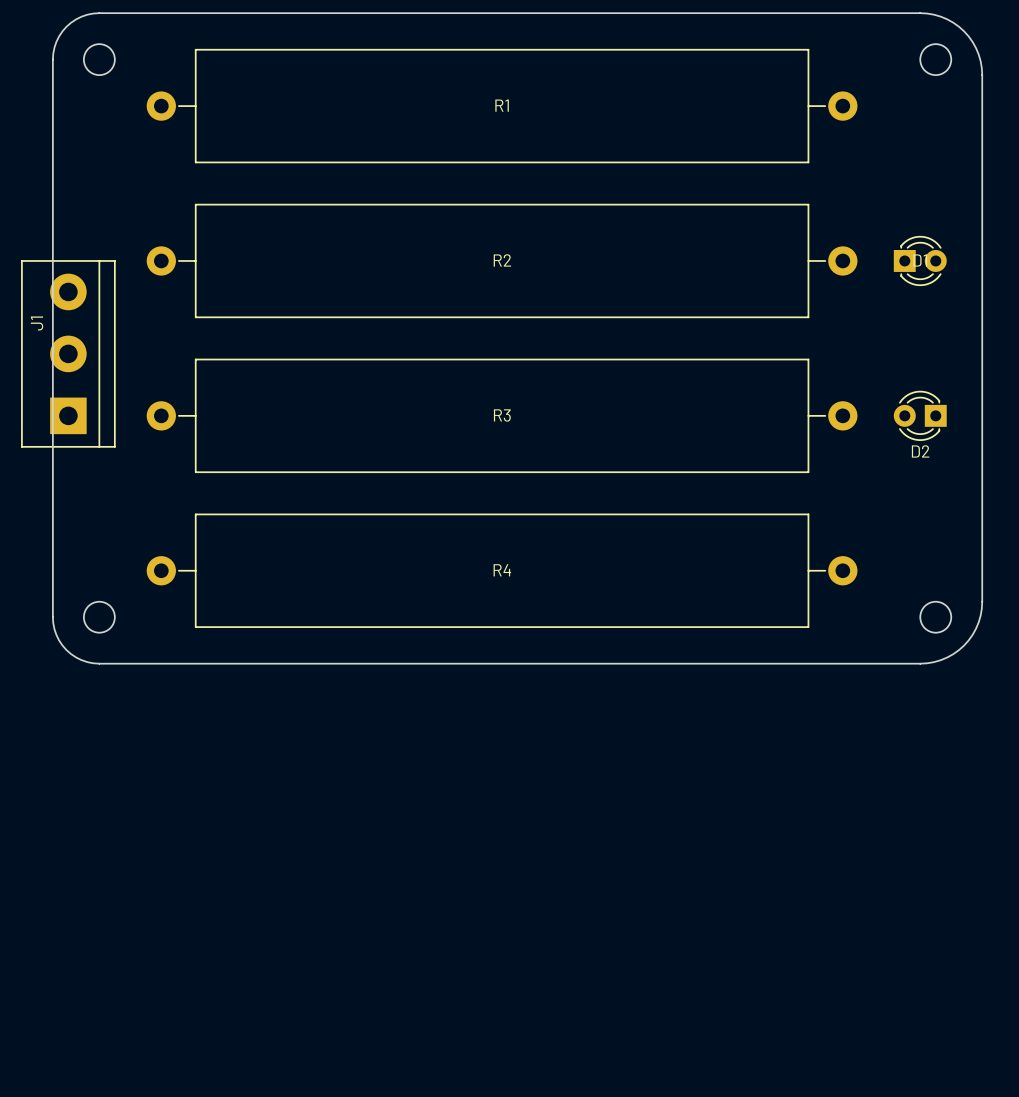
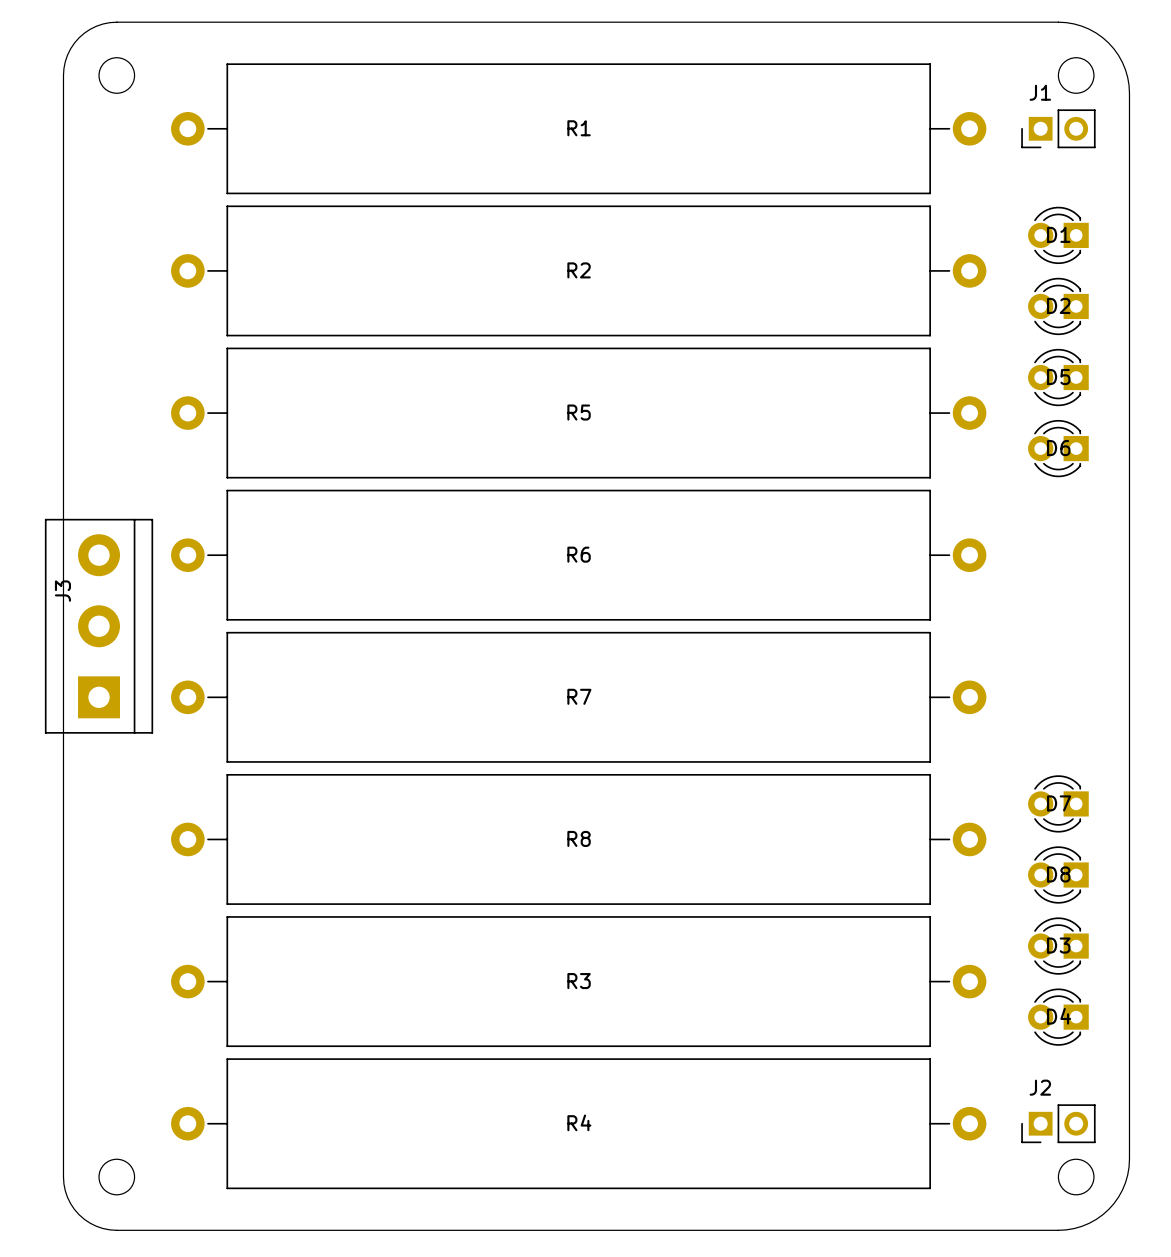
J1 footprint: [21, 260, 116, 448] -> [1021, 109, 1096, 149]
R2 position: (502, 260) -> (578, 270)
D1 rotation: 0° (920, 260) -> 180° (1058, 235)
D1 position: (920, 260) -> (1058, 235)
D5: none -> (1058, 377)
R5: none -> (578, 413)
D6: none -> (1058, 448)
R3 position: (502, 415) -> (578, 981)
D2 position: (920, 415) -> (1058, 306)
D2 name position: D2 (920, 451) -> D2 (1058, 305)
R6: none -> (578, 555)
J3: none -> (99, 626)
R4 position: (502, 570) -> (578, 1123)
round board edge: [83, 601, 116, 634] -> none
R7: none -> (578, 697)
round board edge: [919, 601, 952, 634] -> none
board edge: (982, 601) (978, 622) (972, 634) (964, 645) (953, 654) (940, 660) (920, 663) (99, 663) (81, 660) (66, 650) (56, 635) (52, 617) -> (1129, 697) (1129, 1167) (1122, 1190) (1108, 1209) (1096, 1219) (1081, 1226) (1058, 1230) (116, 1230) (102, 1228) (90, 1223) (79, 1214) (70, 1203) (65, 1190) (63, 1177) (63, 715)
D7: none -> (1058, 803)
R8: none -> (578, 839)
D8: none -> (1058, 874)
D3: none -> (1058, 946)
D4: none -> (1058, 1017)
J2: none -> (1058, 1123)
round board edge: none -> [98, 1158, 135, 1196]
round board edge: none -> [1058, 1158, 1095, 1196]

